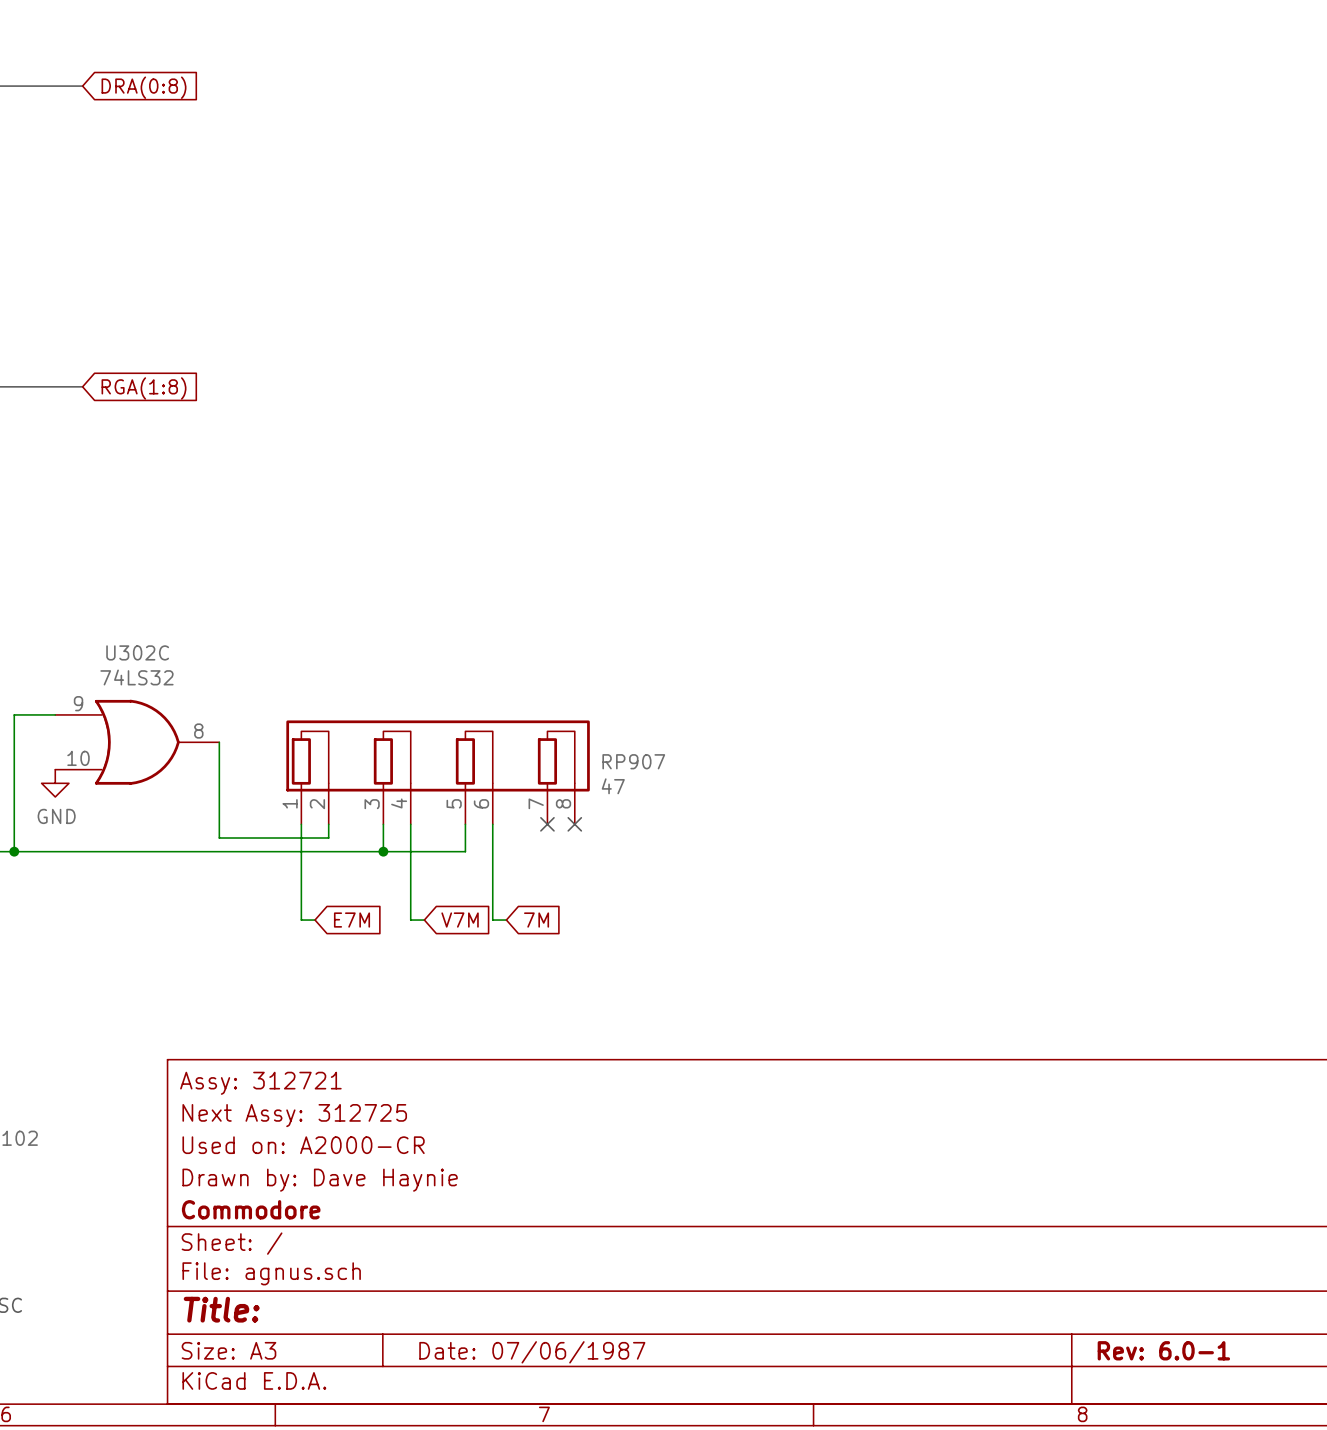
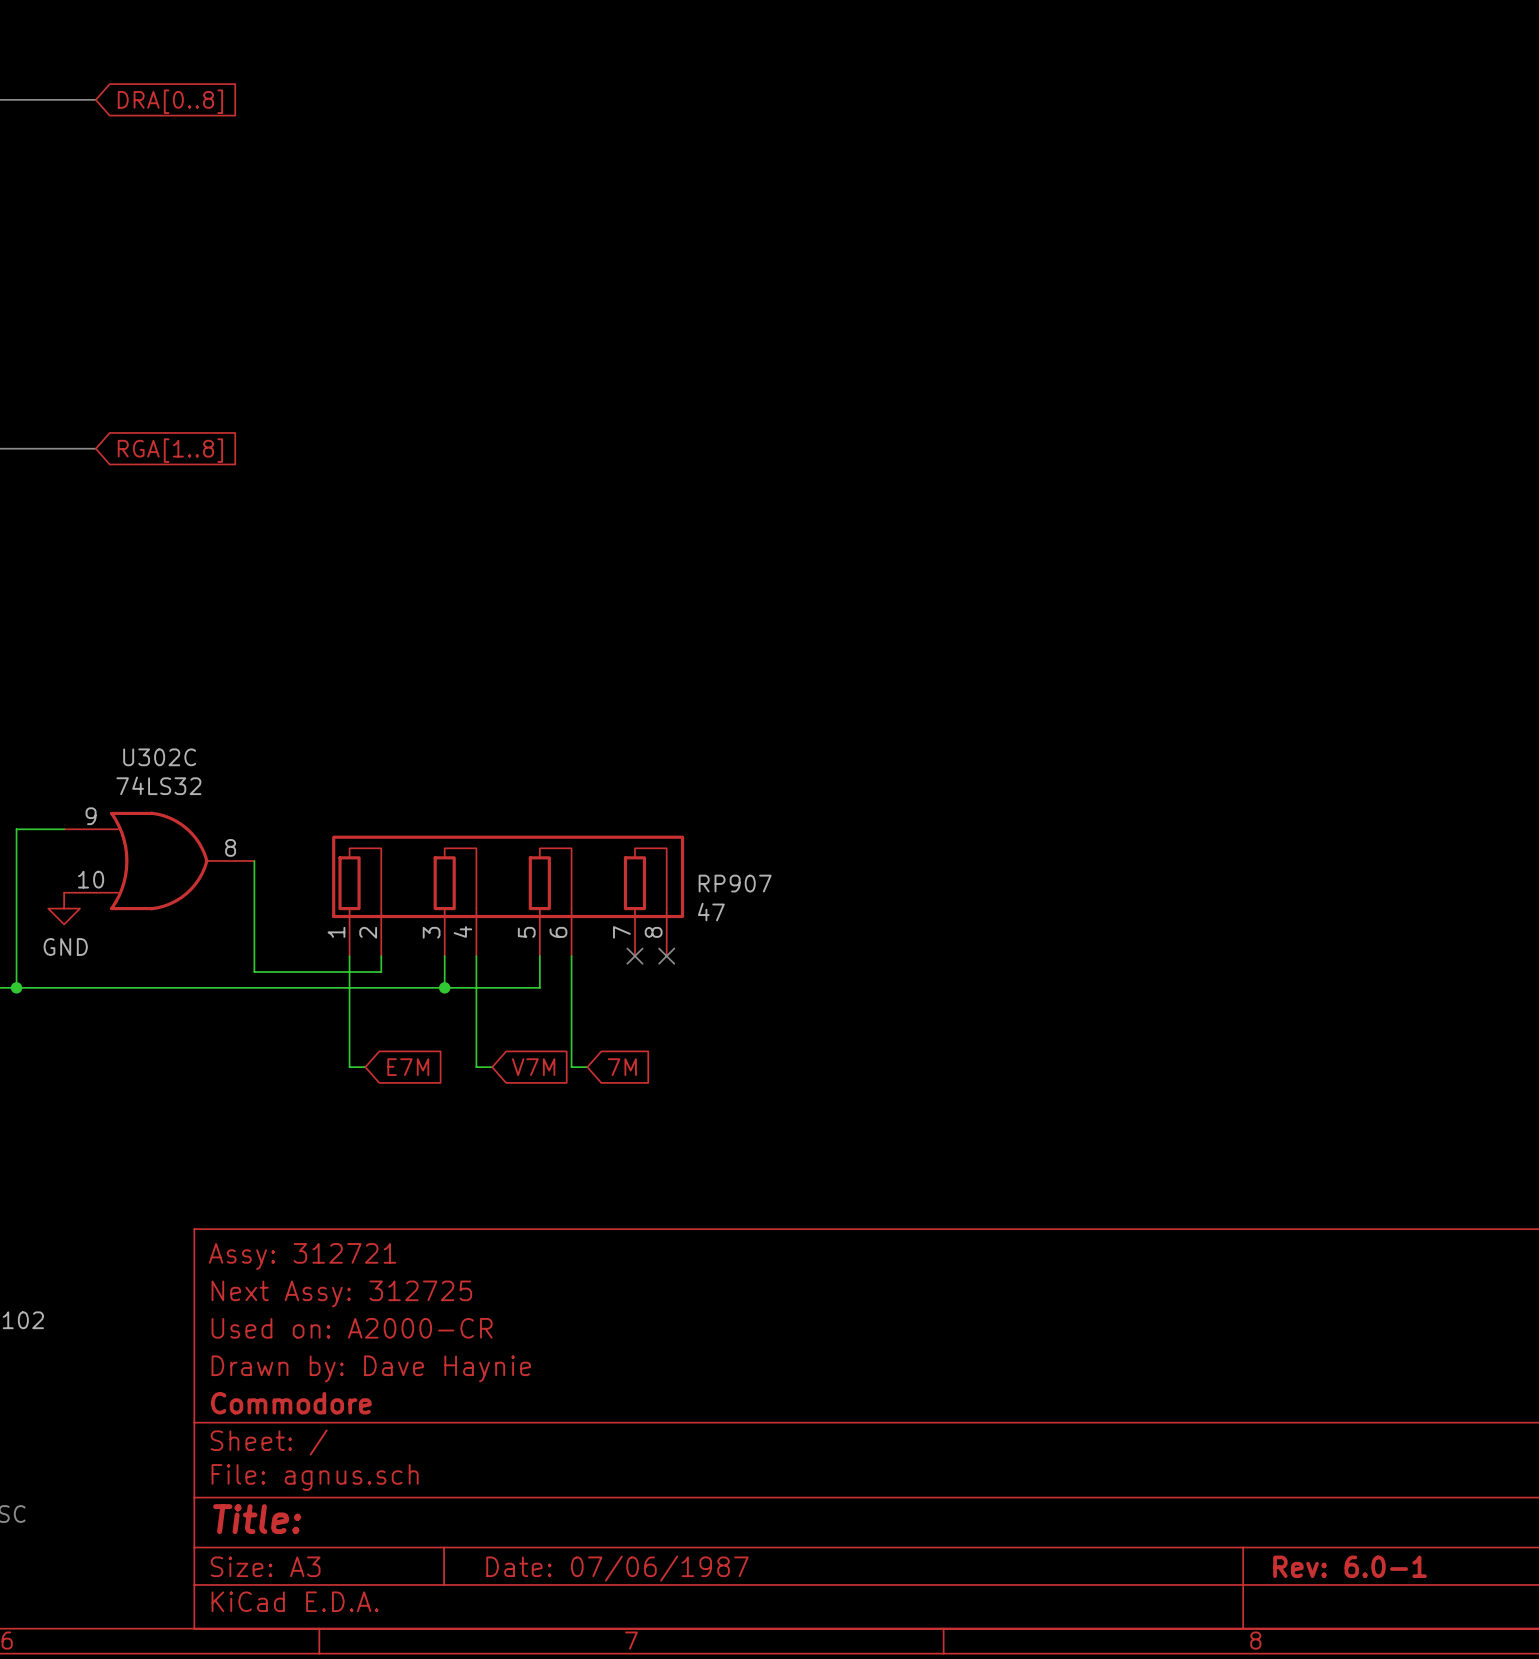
global label: DRA(0:8) (144, 87) -> DRA[0..8] (170, 101)
global label: RGA(1:8) (144, 388) -> RGA[1..8] (170, 450)

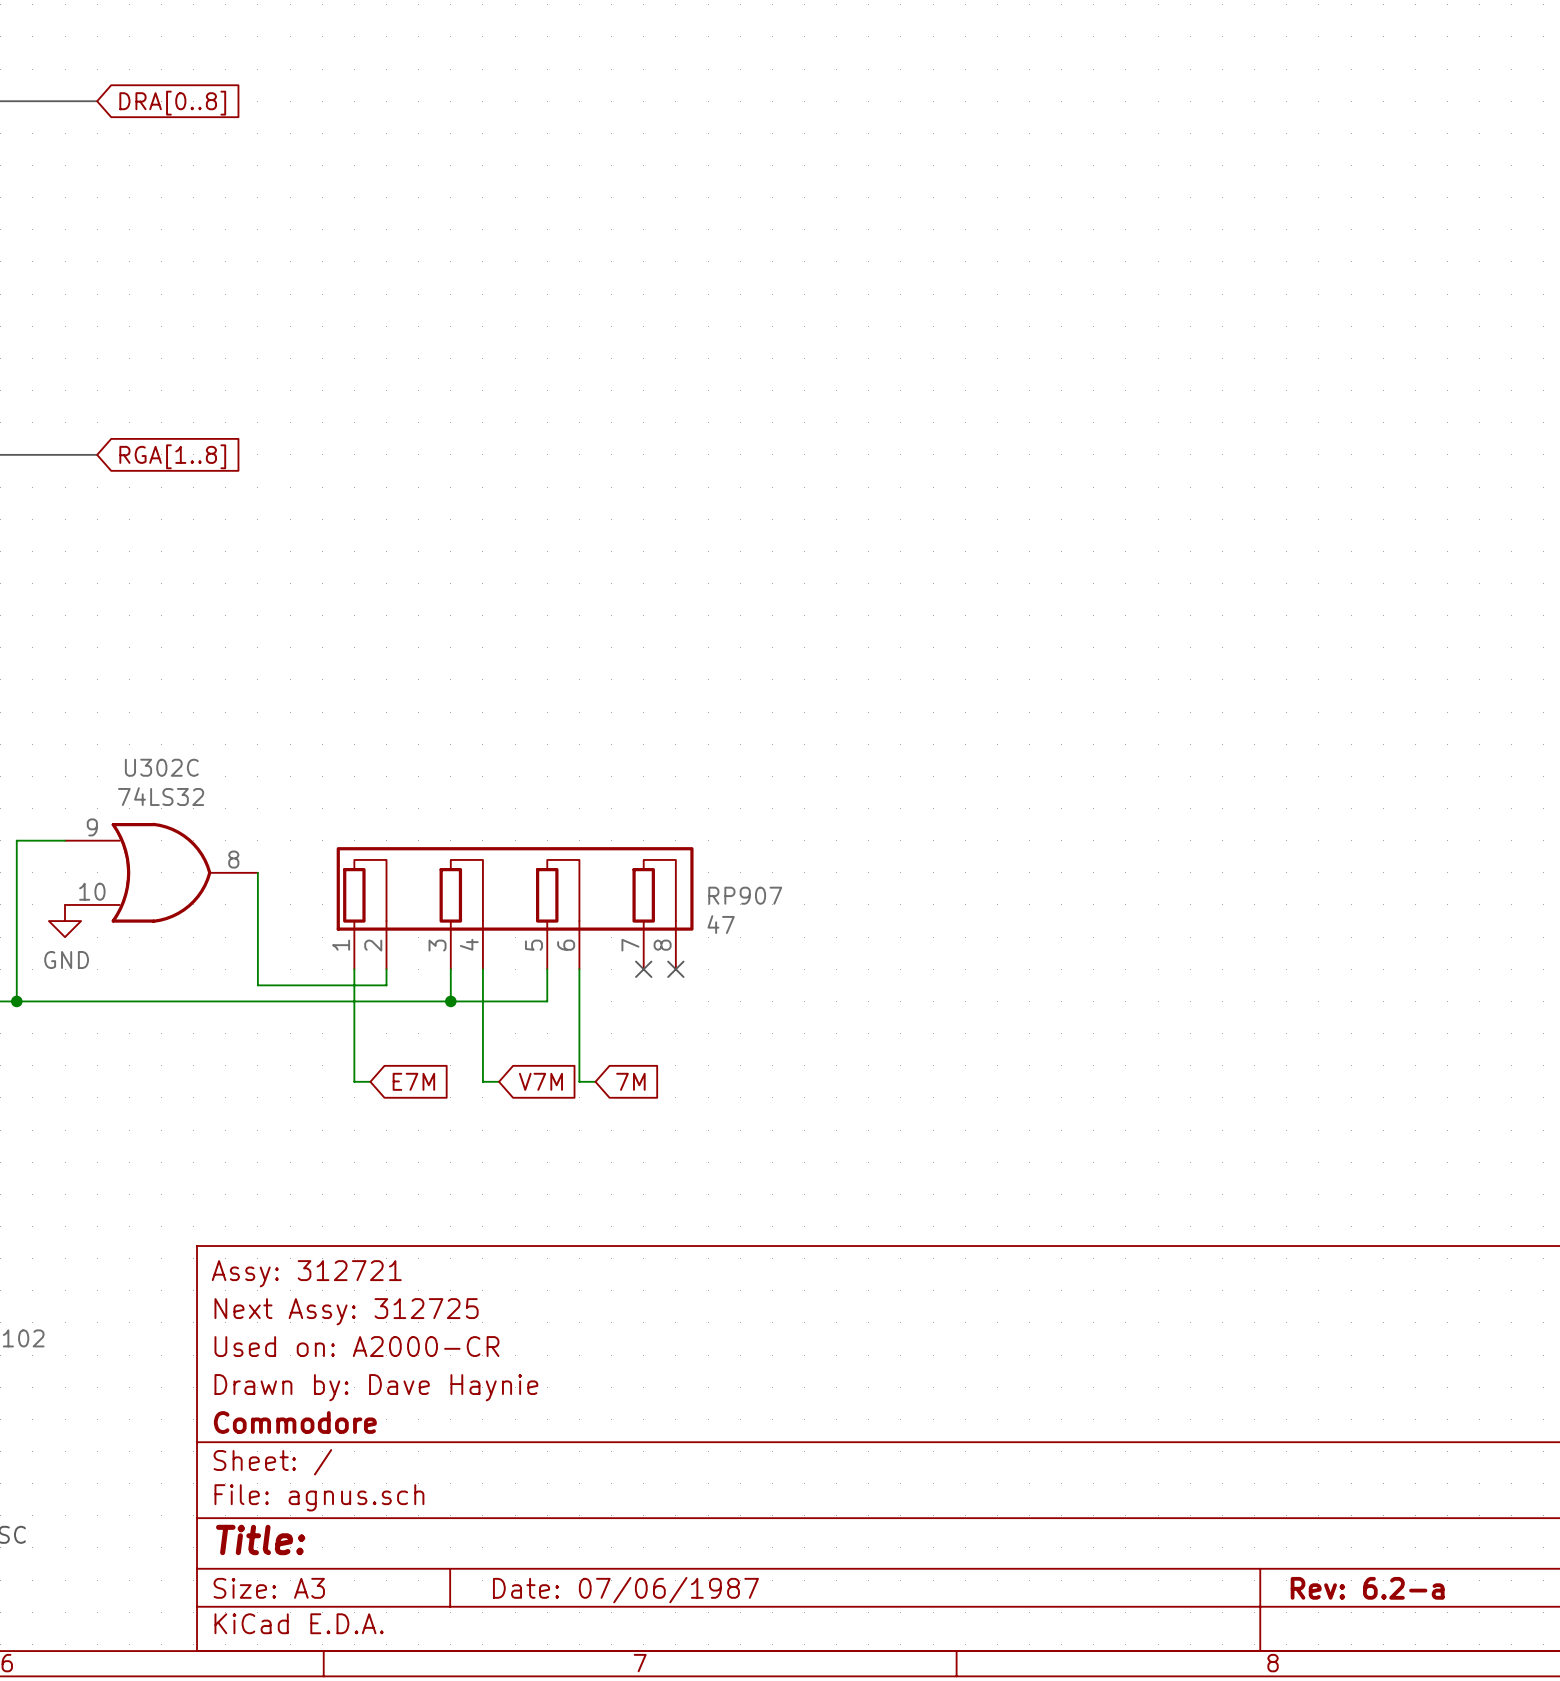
title block: Rev: 6.0-1 (1349, 1566) -> Rev: 6.2-a (1367, 1588)

